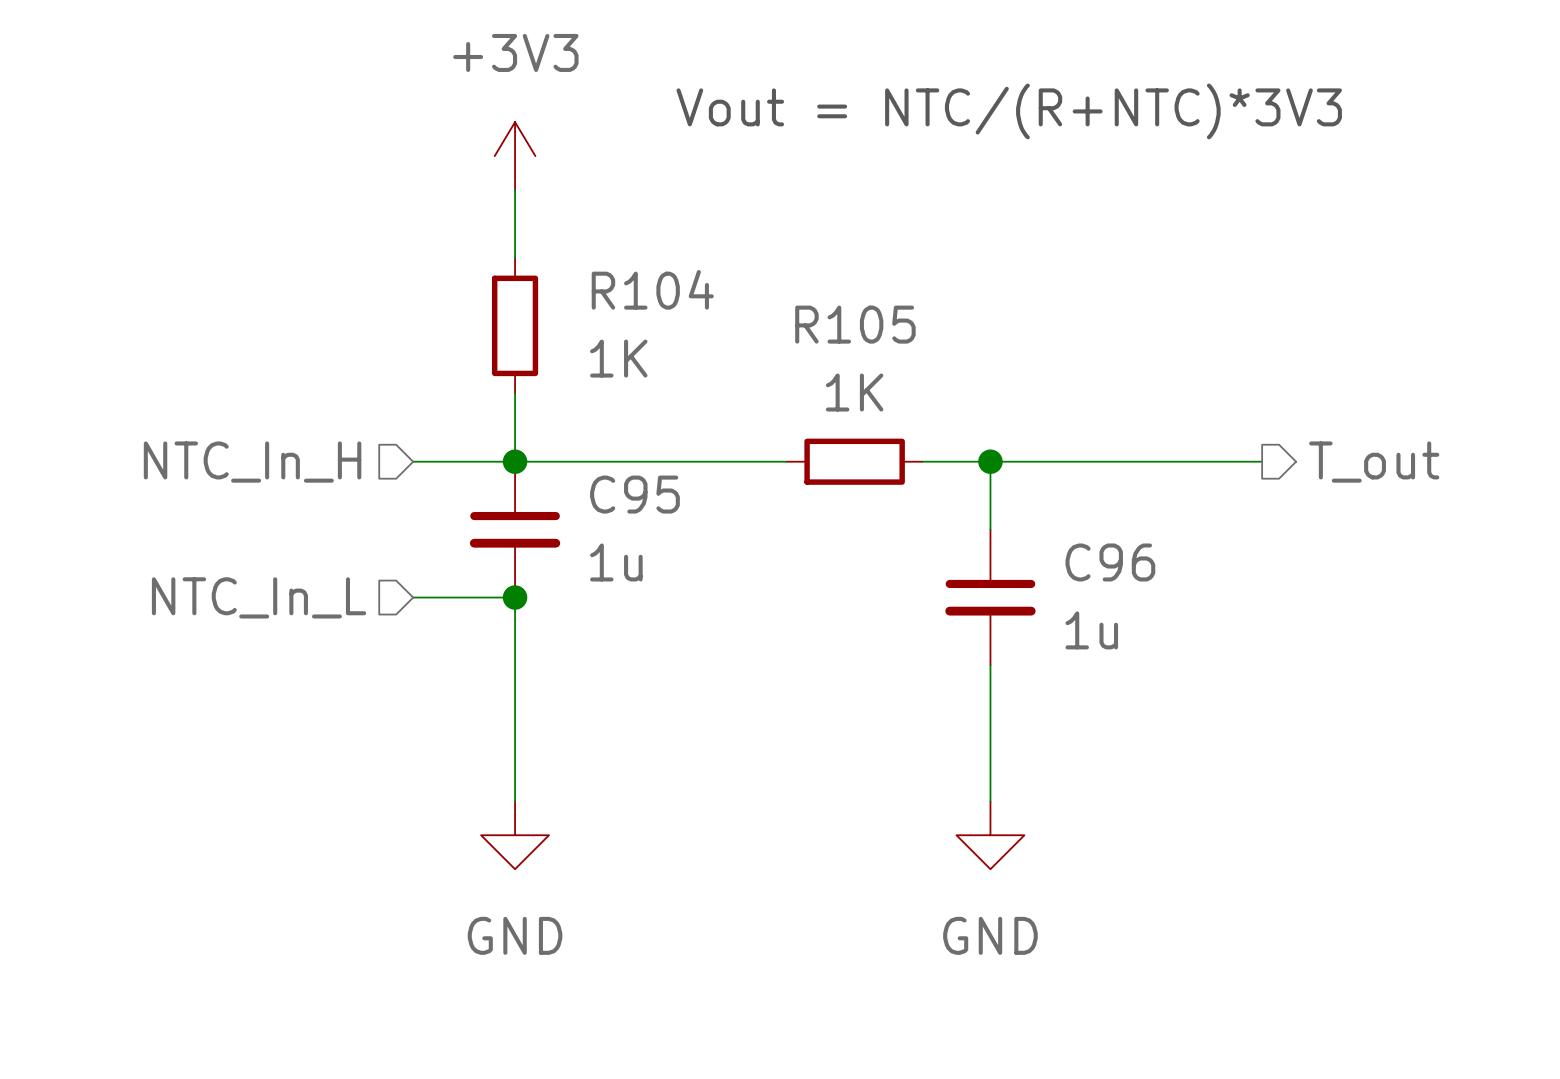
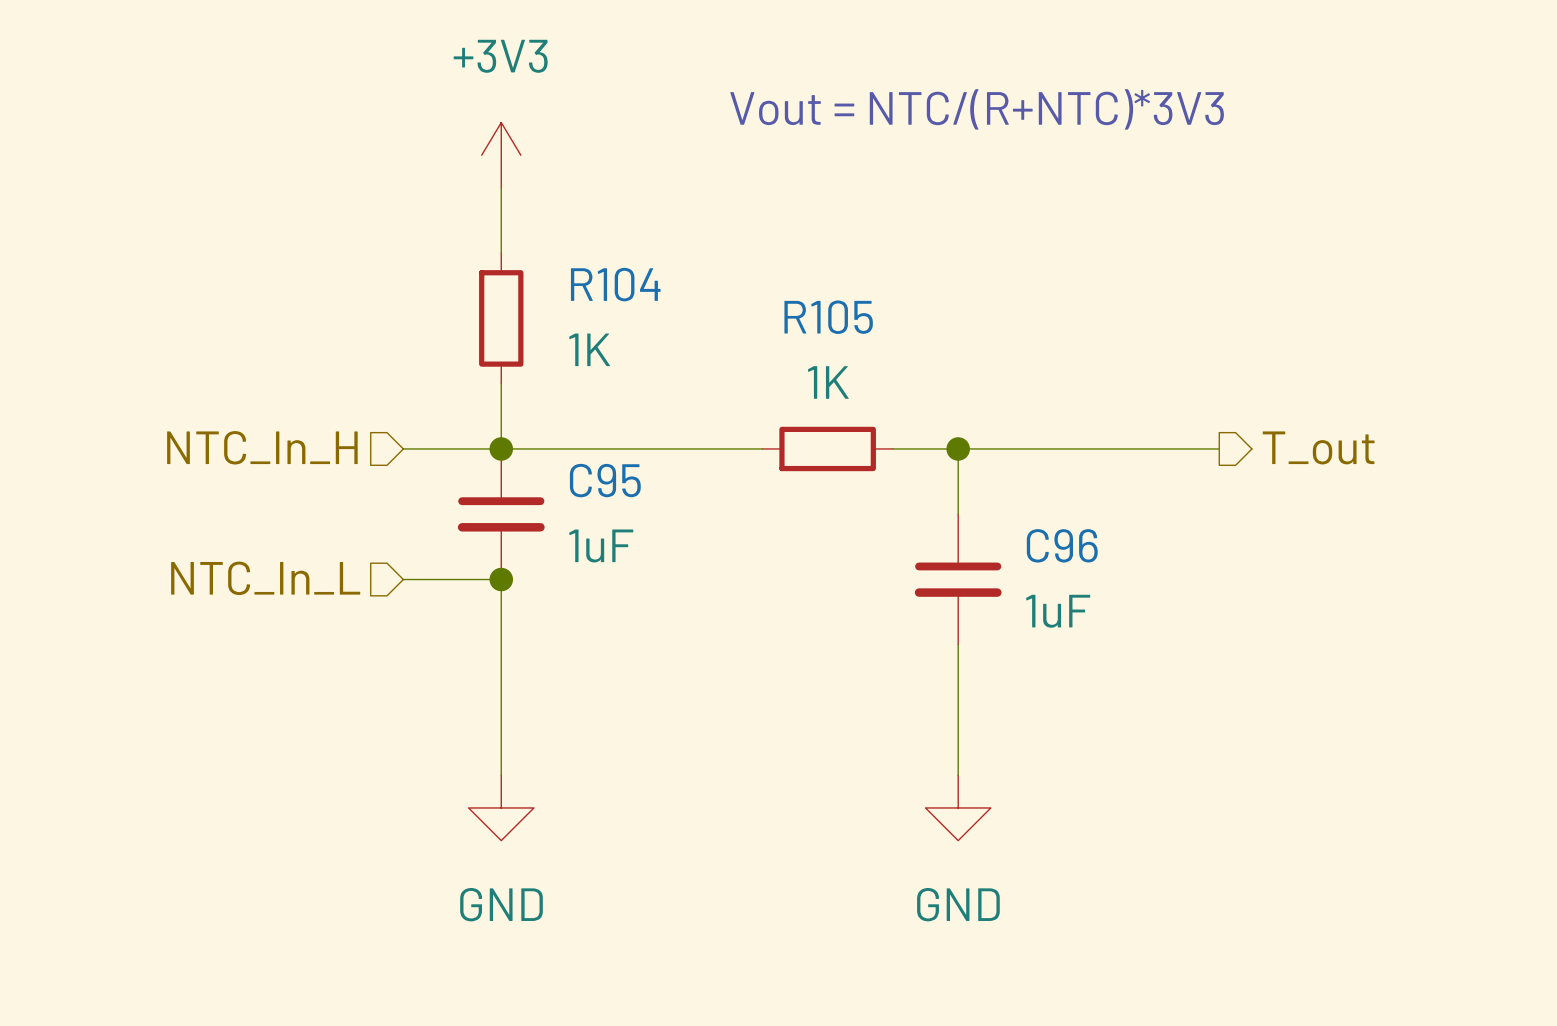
C95 value: 1u (616, 562) -> 1uF (601, 545)
C96 value: 1u (1091, 630) -> 1uF (1058, 611)

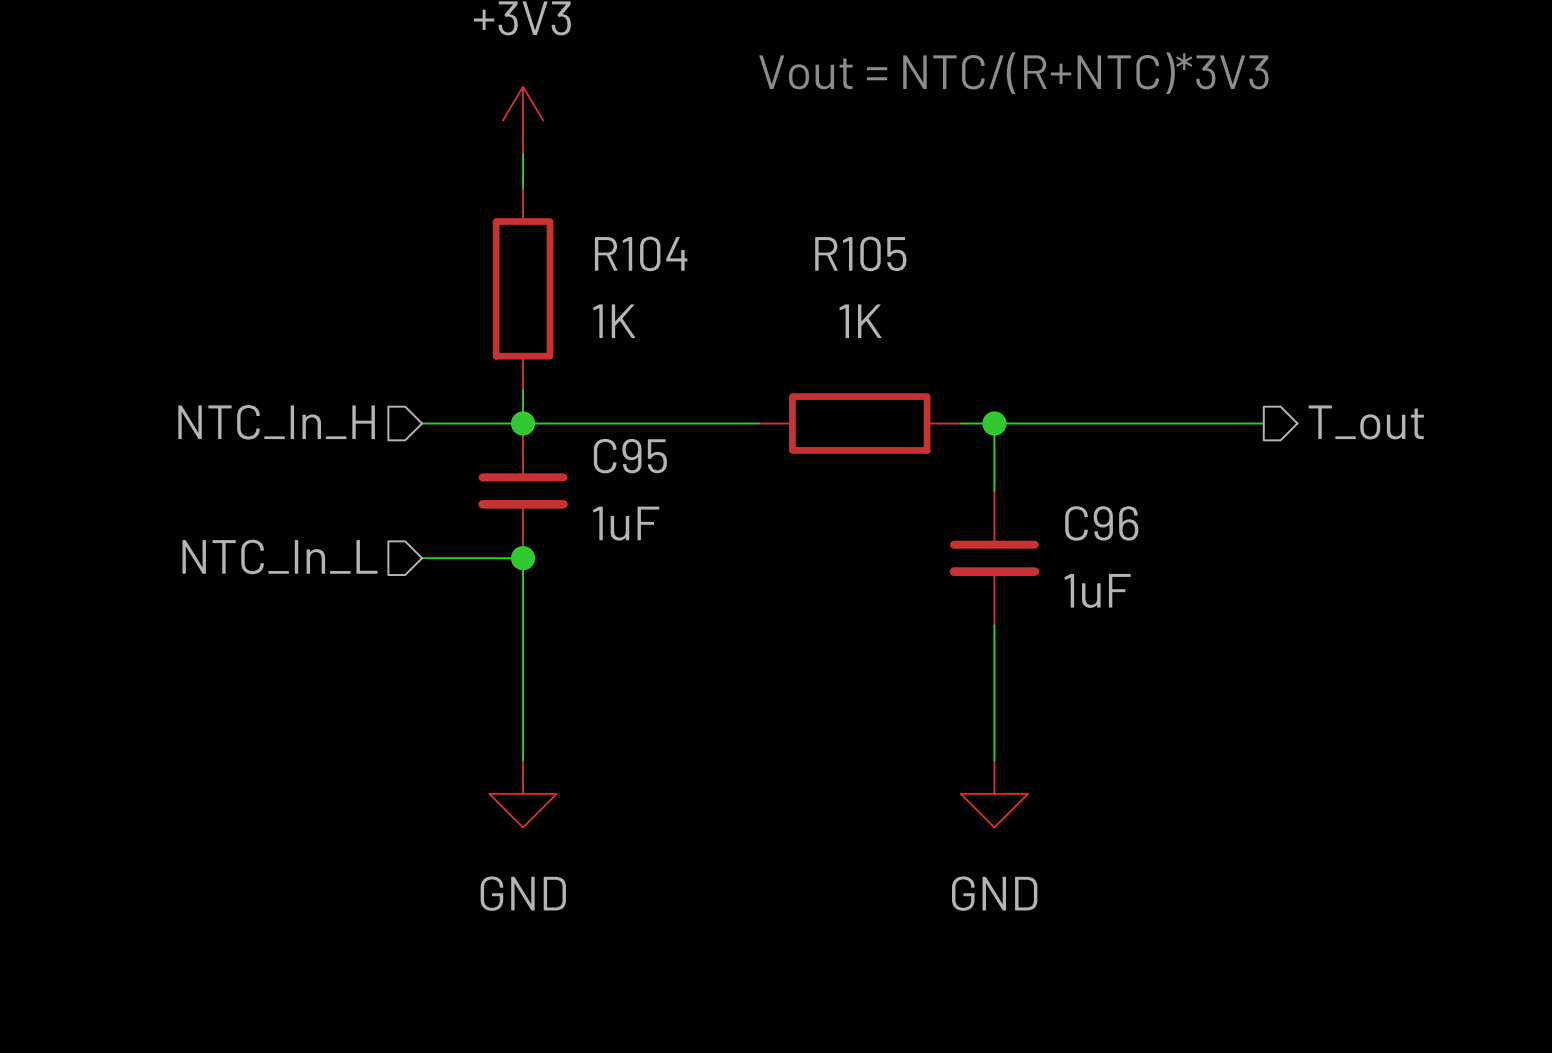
R104 symbol: [479, 253, 524, 384] -> [492, 187, 554, 390]
R105 symbol: [762, 426, 893, 472] -> [758, 393, 961, 454]

